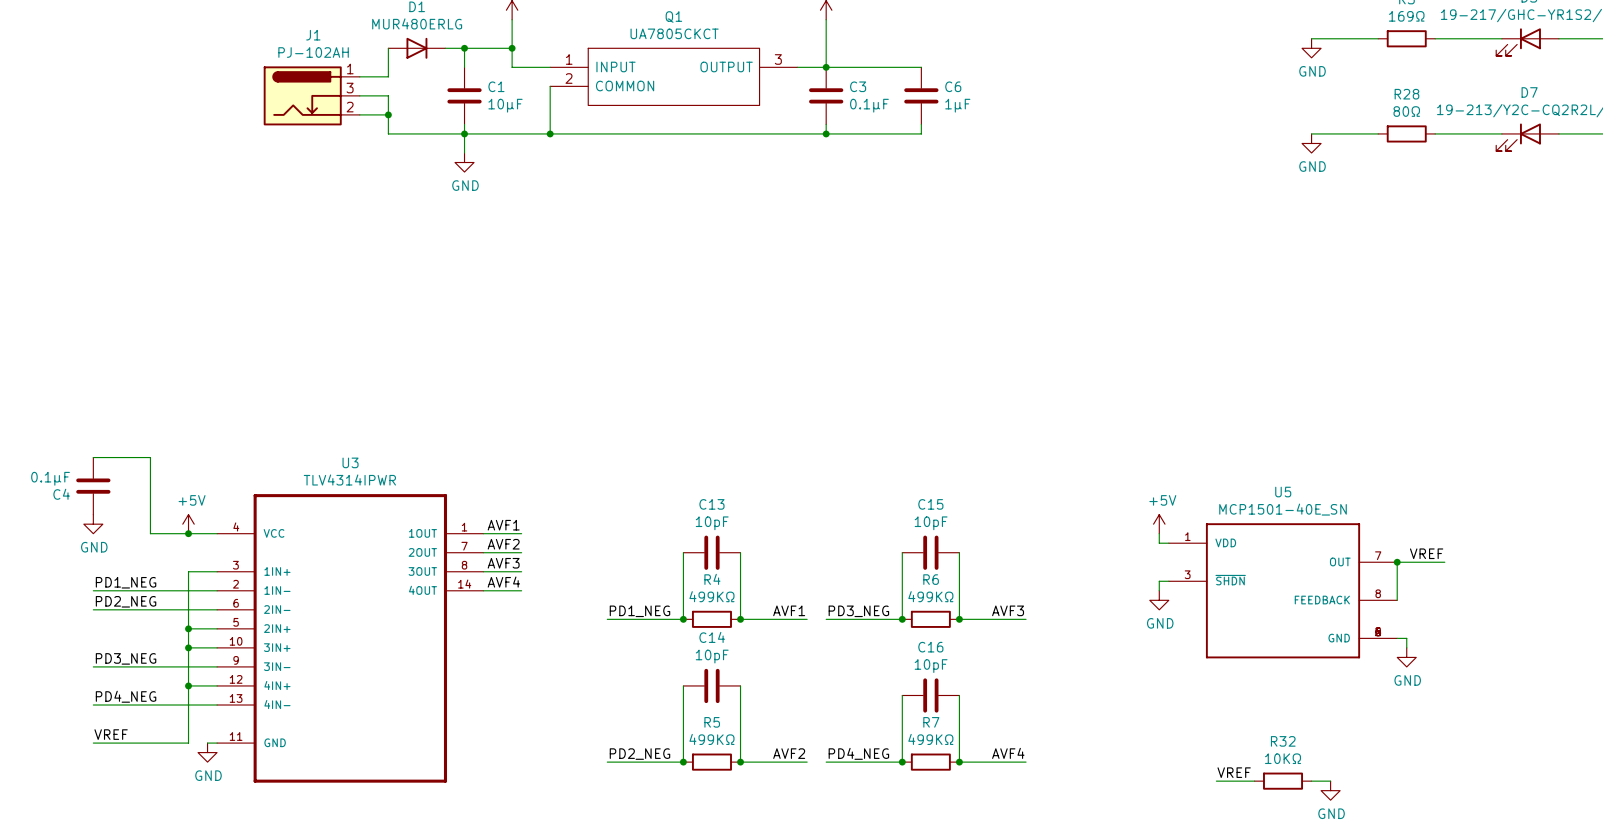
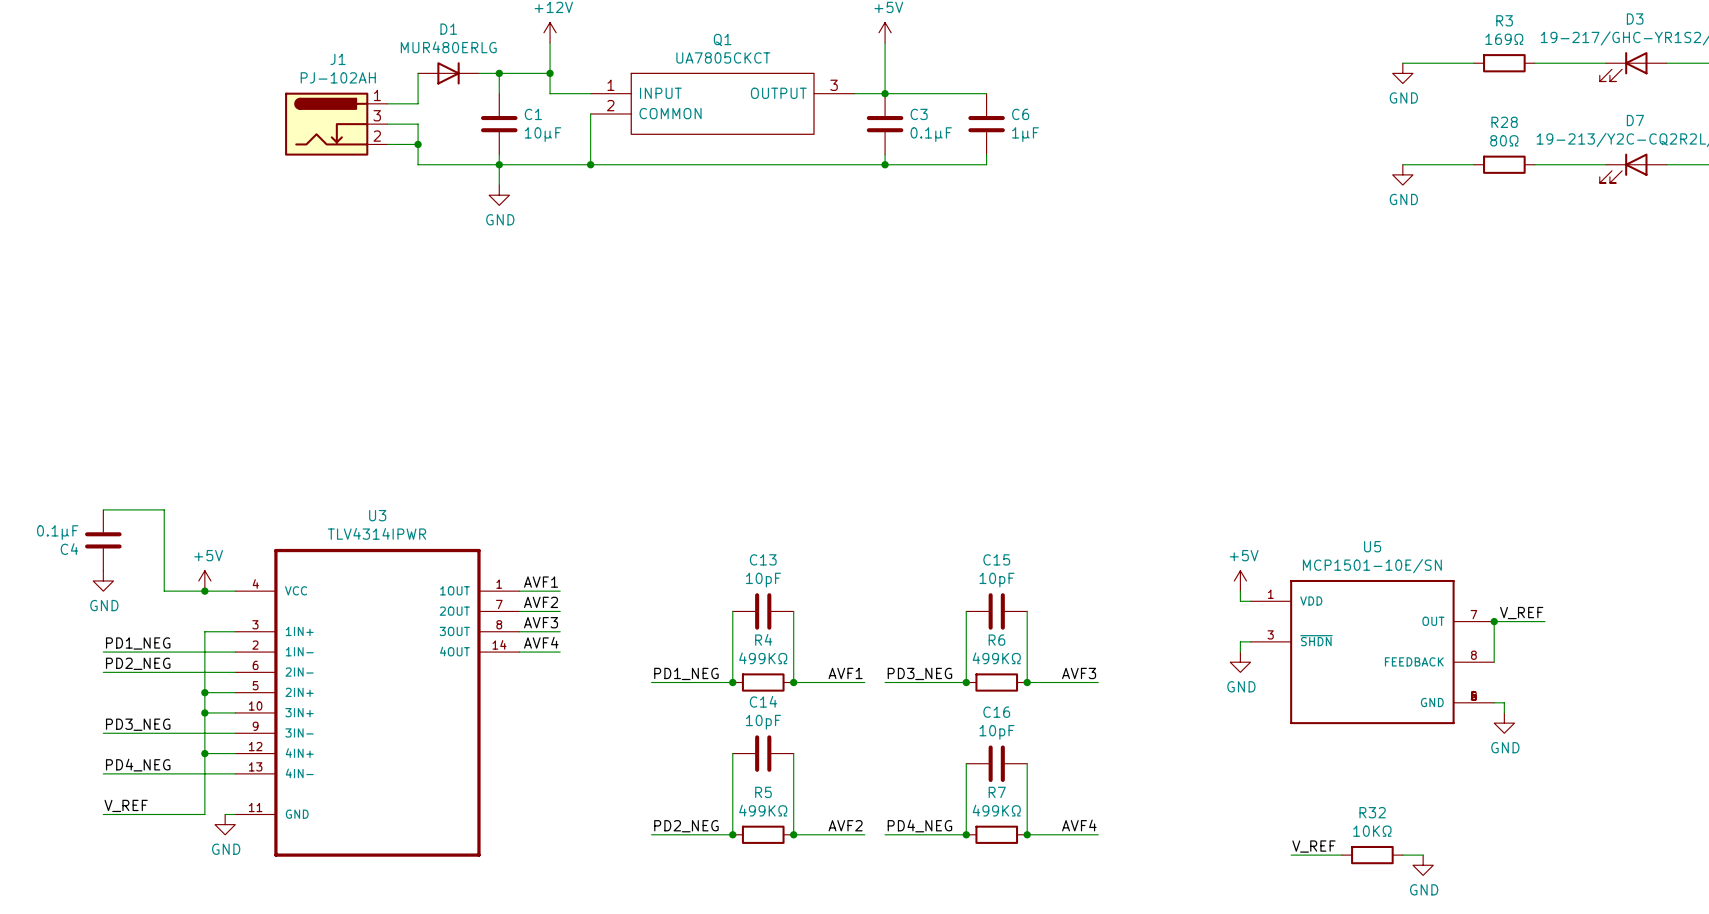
U5 value: MCP1501-40E_SN (1283, 509) -> MCP1501-10E/SN (1372, 566)
label: VREF (1426, 553) -> V_REF (1521, 613)
label: VREF (111, 734) -> V_REF (126, 805)
label: VREF (1234, 772) -> V_REF (1313, 846)
wire: none -> (1291, 855) (1301, 855)

